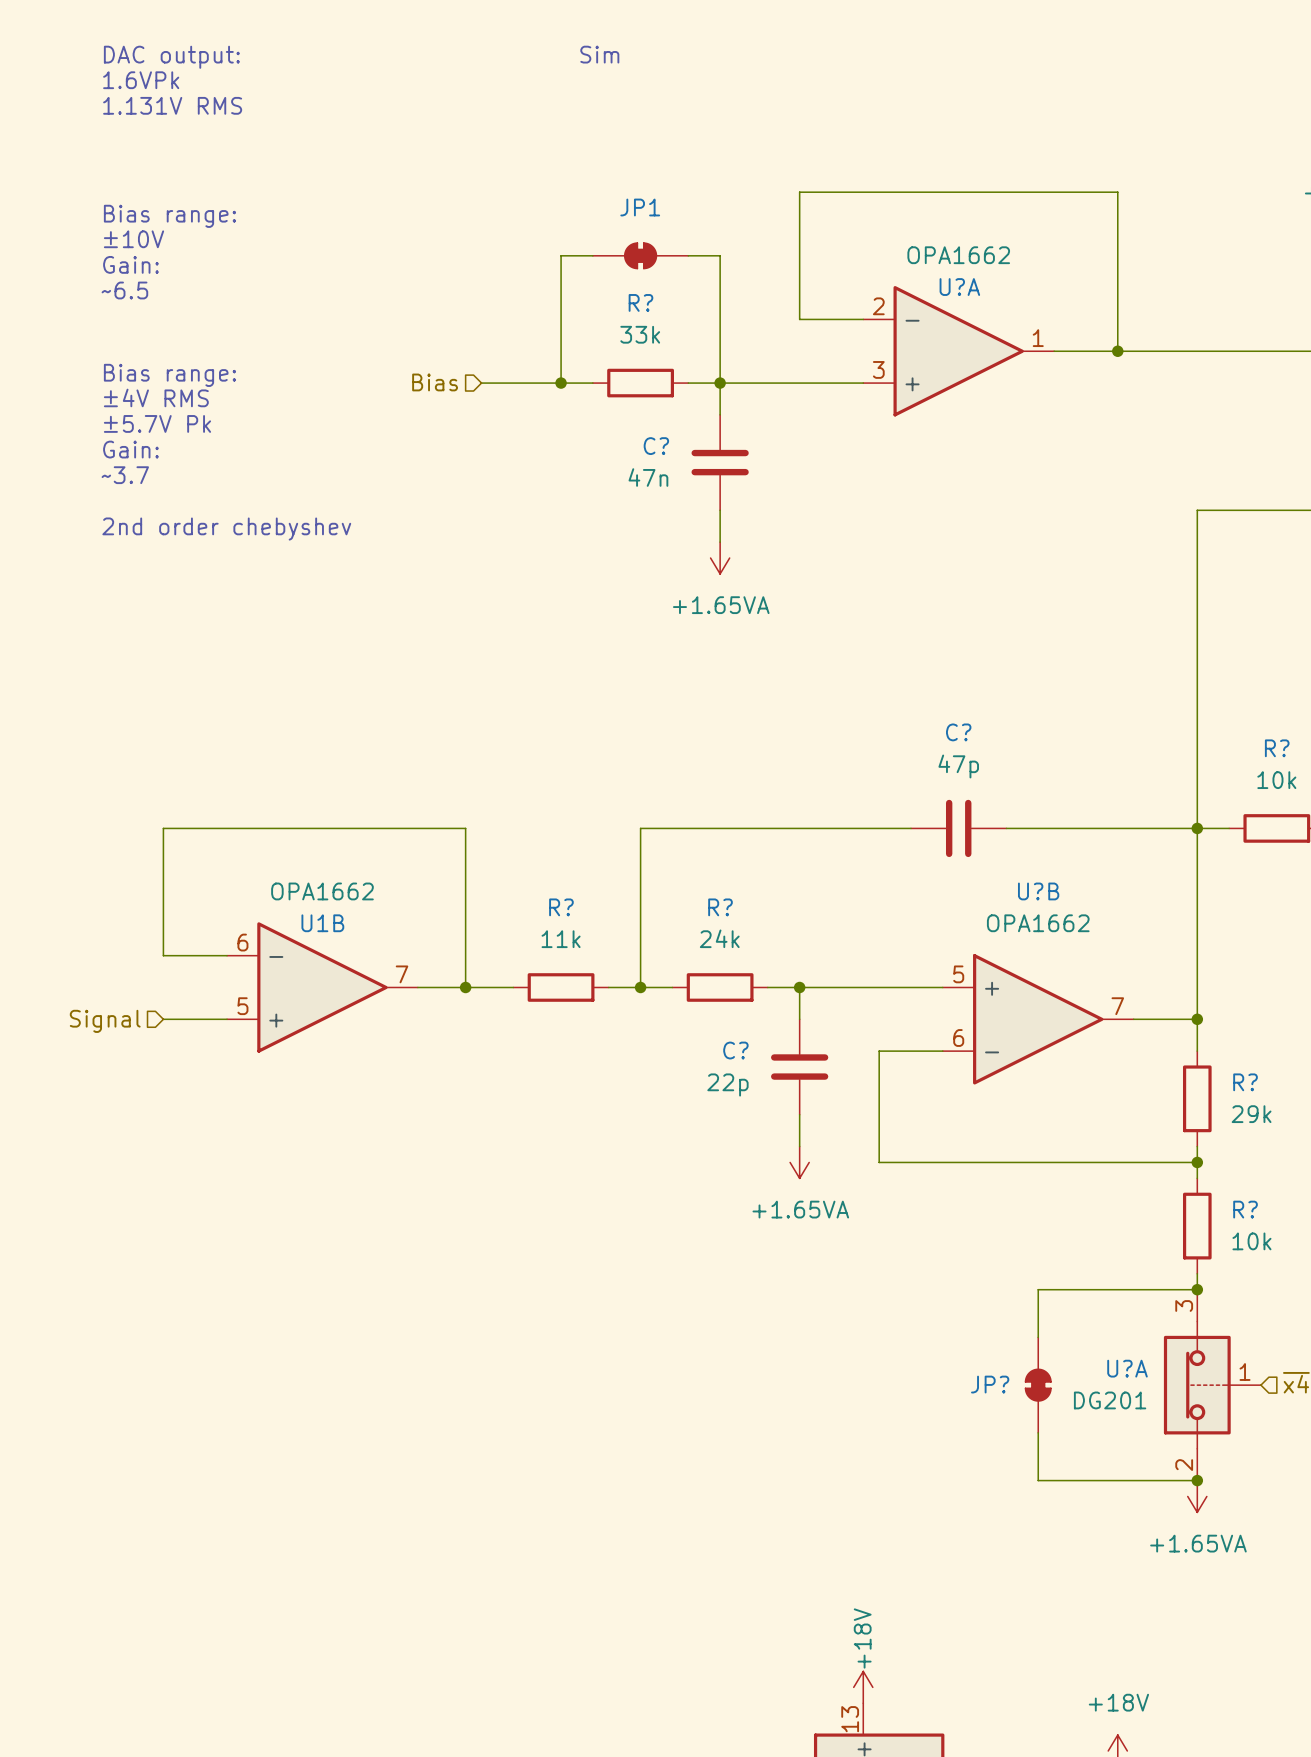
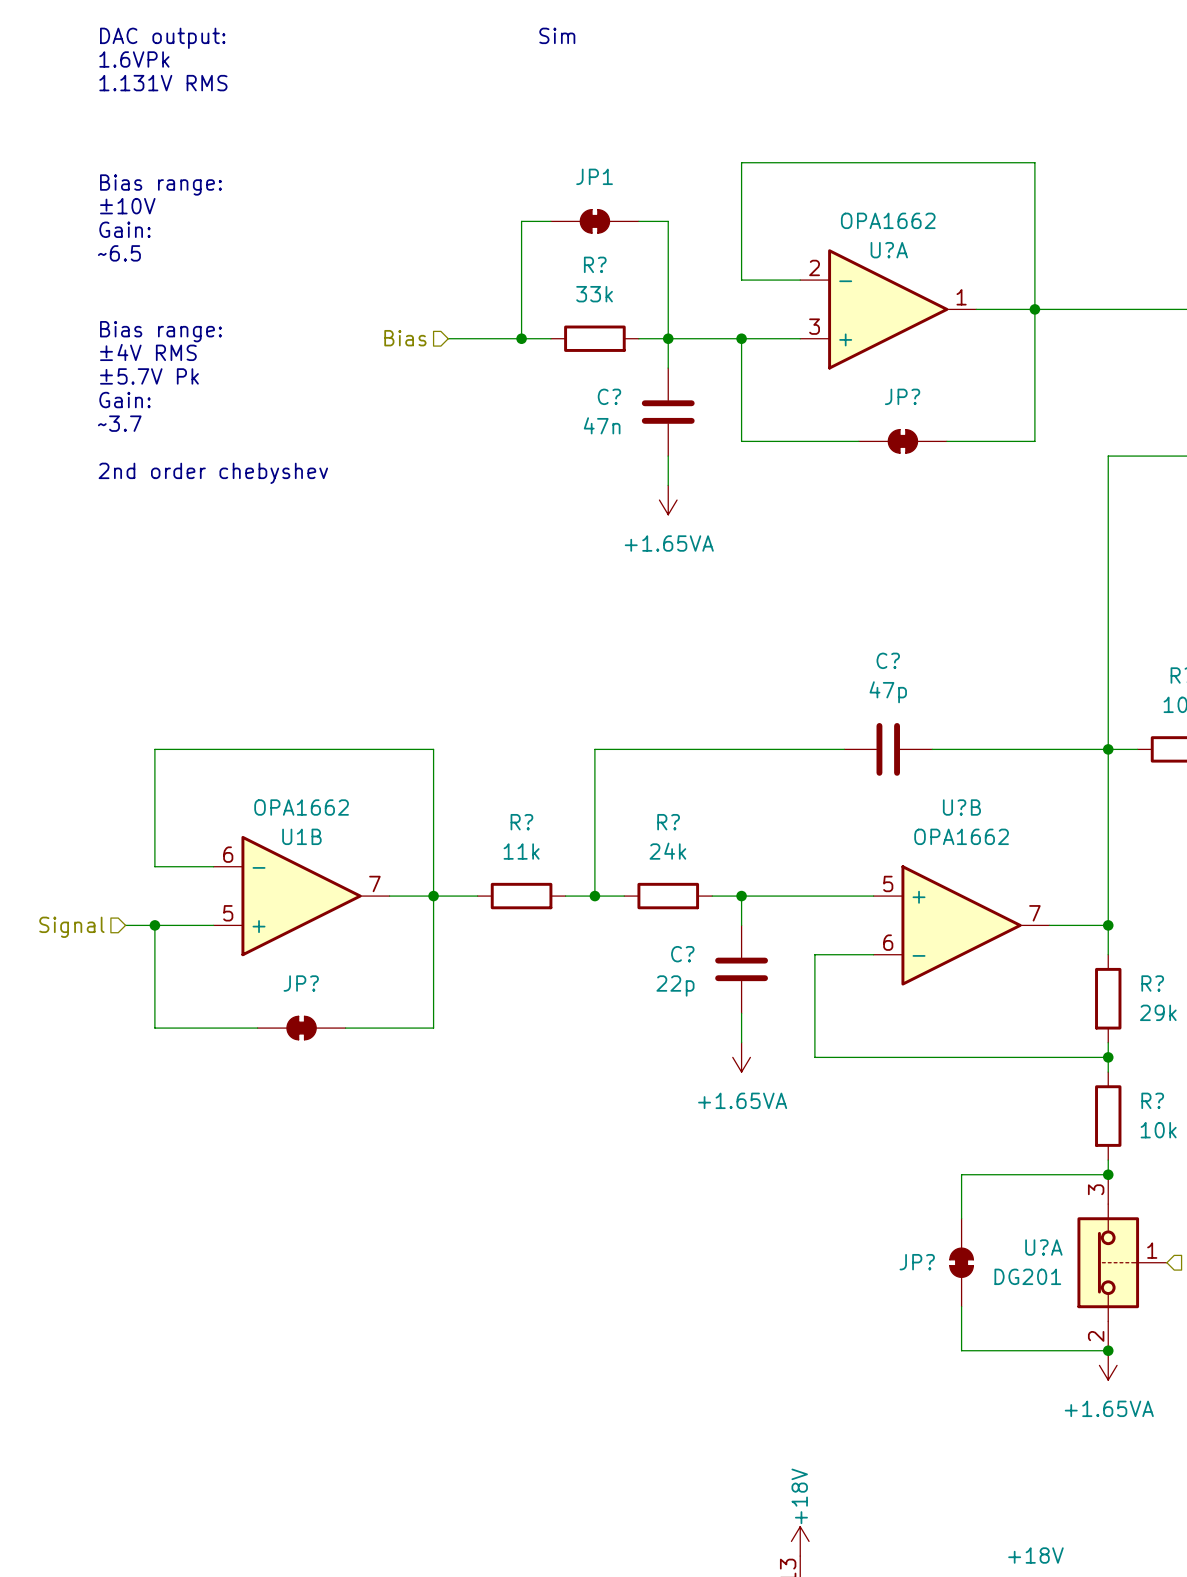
wire: none -> (1034, 309) (1034, 441) (946, 441)
wire: none -> (741, 338) (741, 441) (858, 441)
junction: none -> (741, 338)
JP?: none -> (902, 441)
wire: none -> (433, 896) (433, 1028) (345, 1028)
wire: none -> (125, 925) (154, 925) (154, 1028) (257, 1028)
junction: none -> (154, 925)
hierarchical label position: Signal (105, 1021) -> Signal (71, 927)
JP?: none -> (301, 1028)

